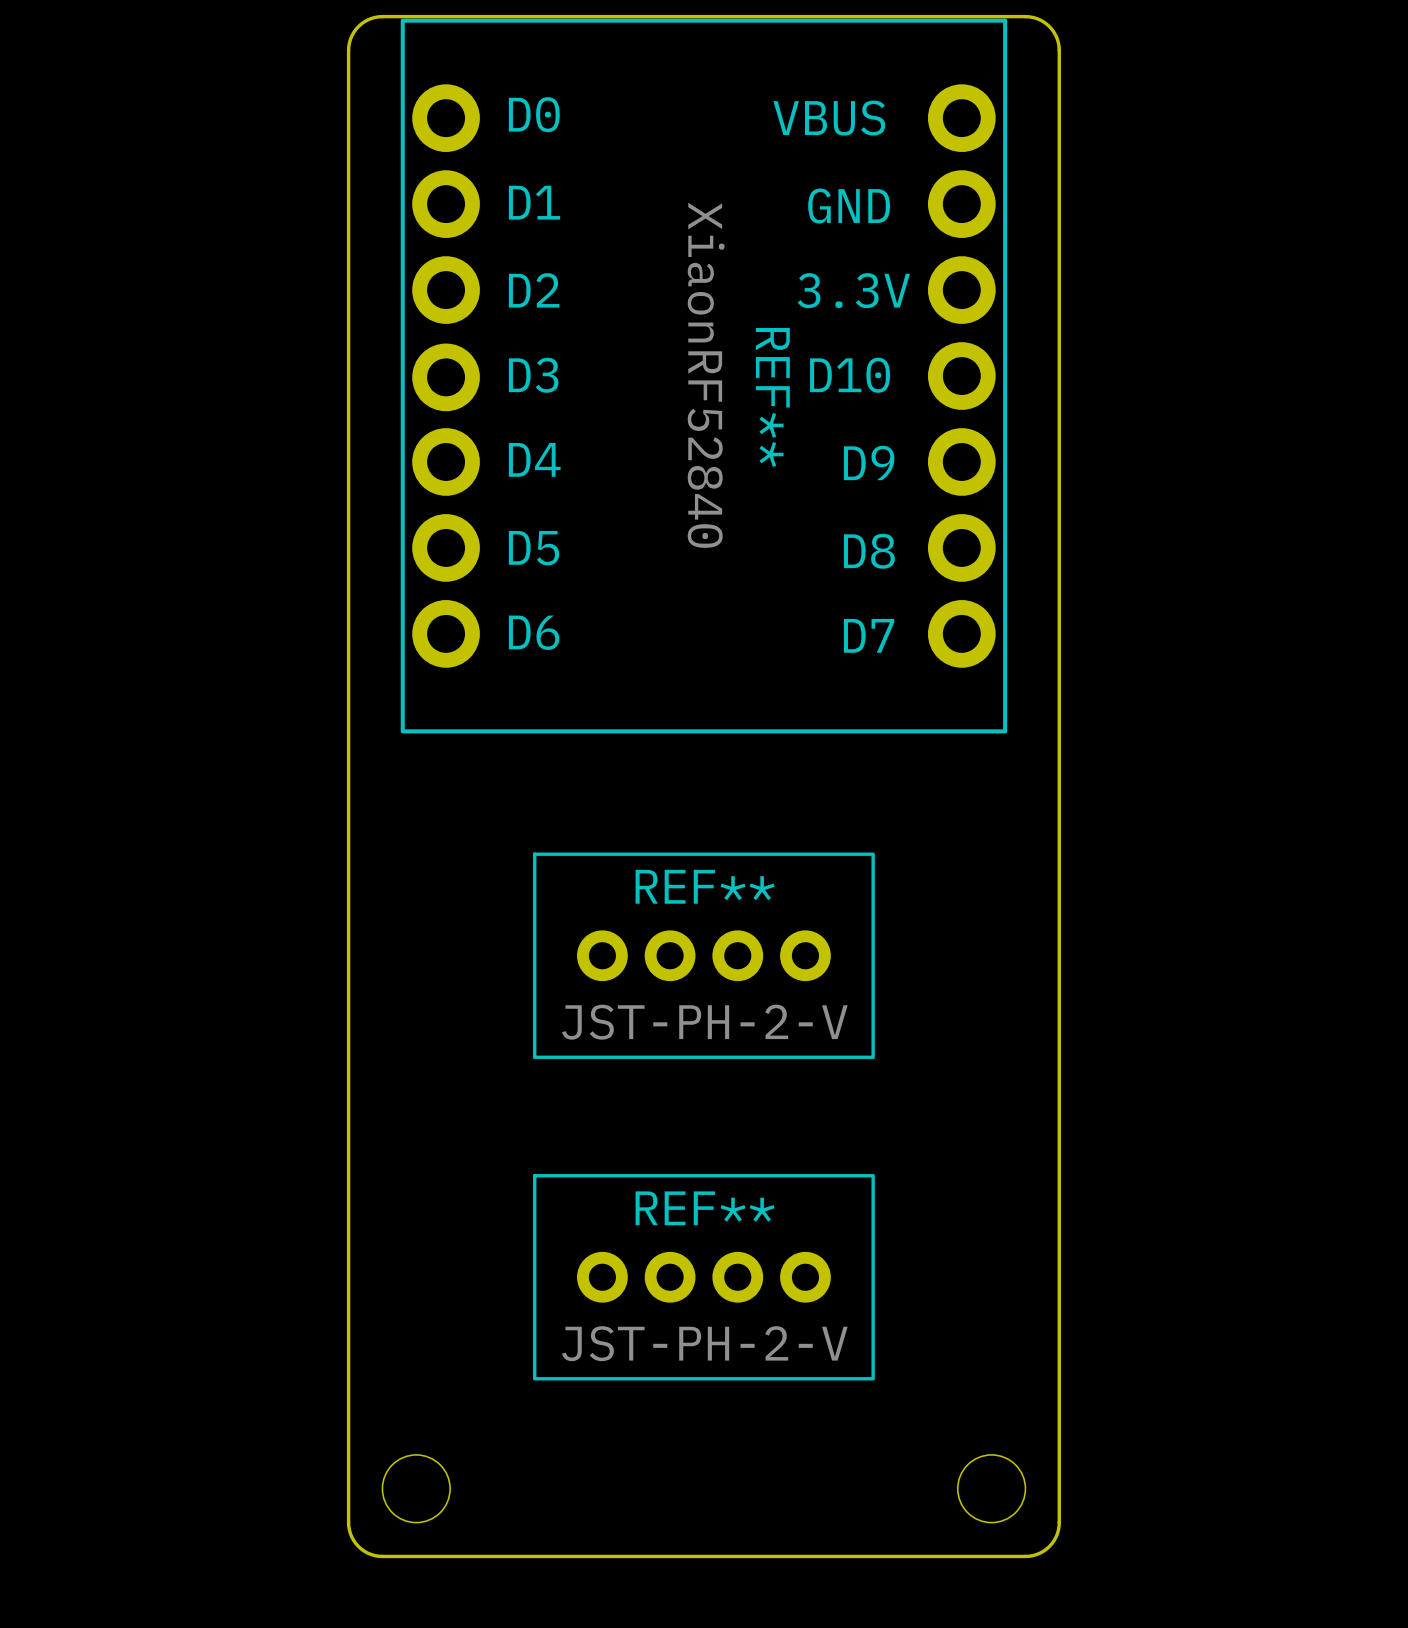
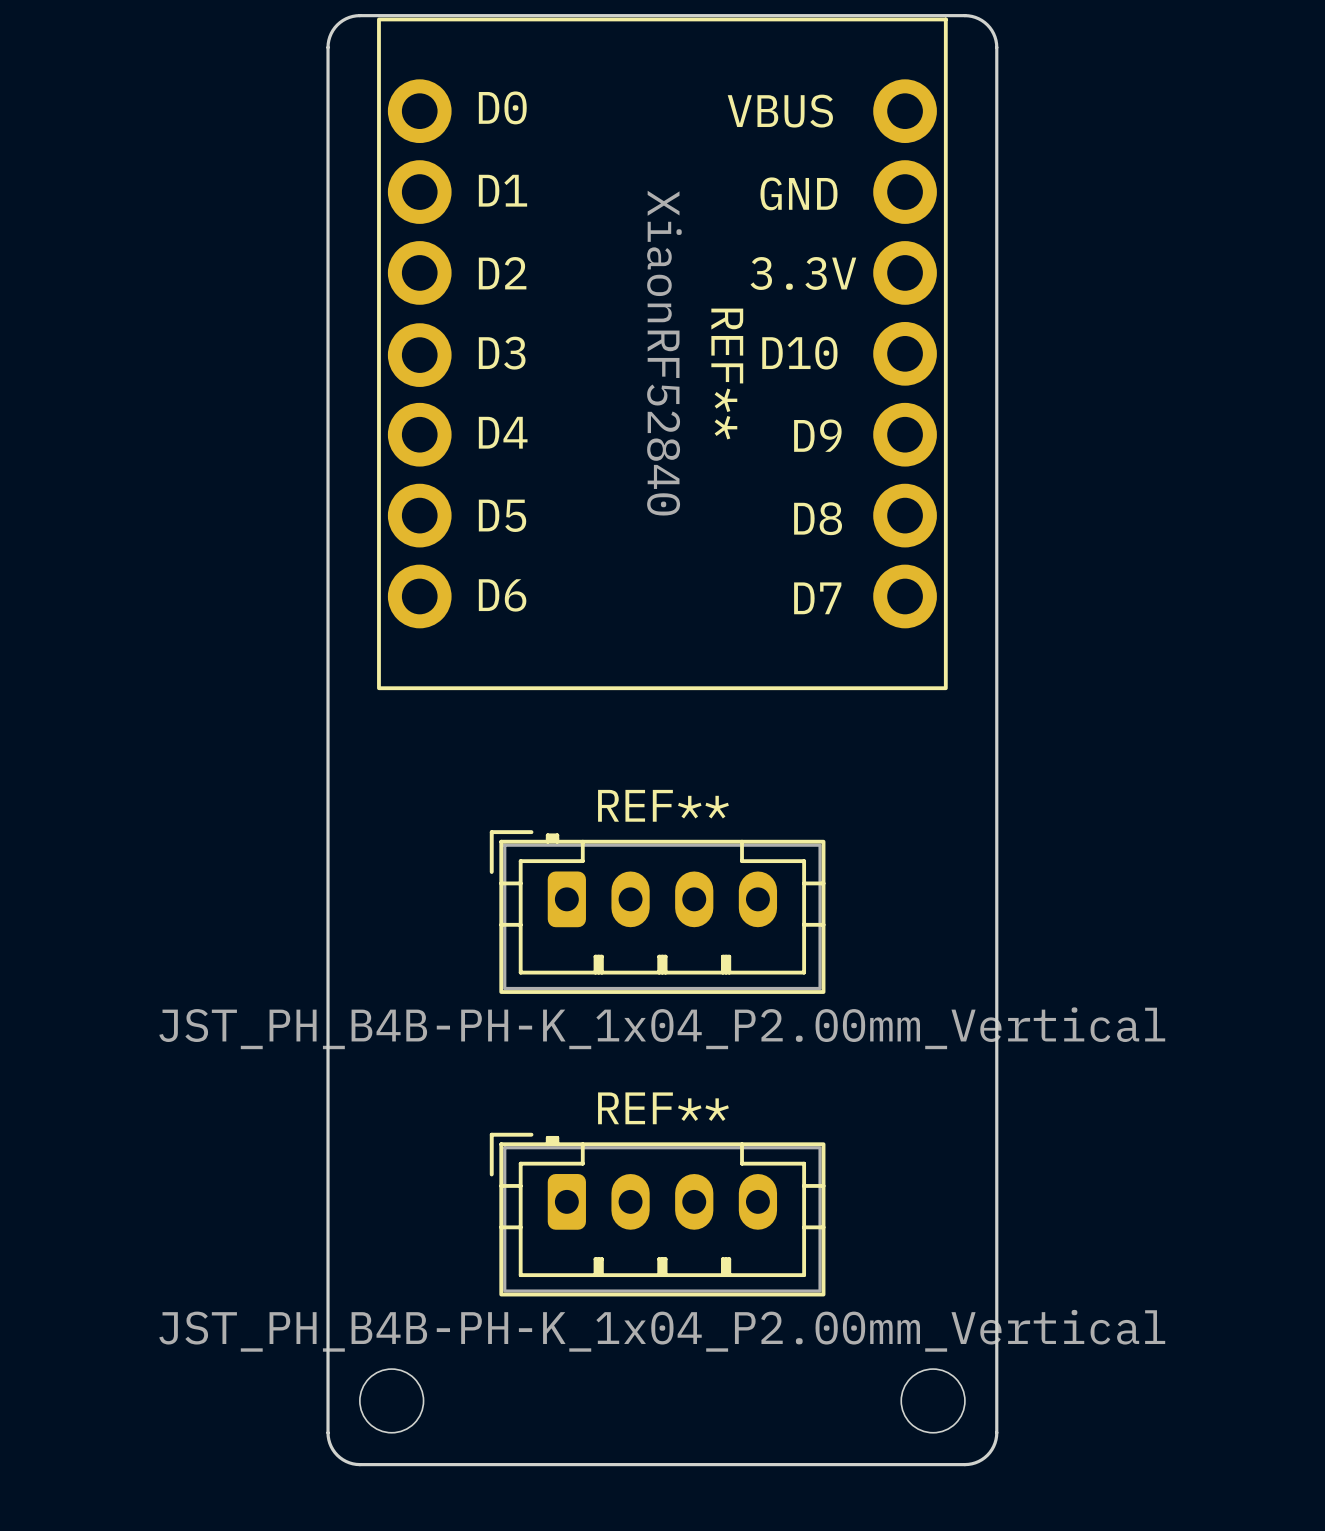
REF** footprint: [533, 852, 875, 1059] -> [489, 830, 826, 994]
REF** value: JST-PH-2-V (704, 1022) -> JST_PH_B4B-PH-K_1x04_P2.00mm_Vertical (662, 1028)
REF** footprint: [533, 1174, 875, 1381] -> [489, 1132, 826, 1297]
REF** value: JST-PH-2-V (704, 1343) -> JST_PH_B4B-PH-K_1x04_P2.00mm_Vertical (662, 1330)

